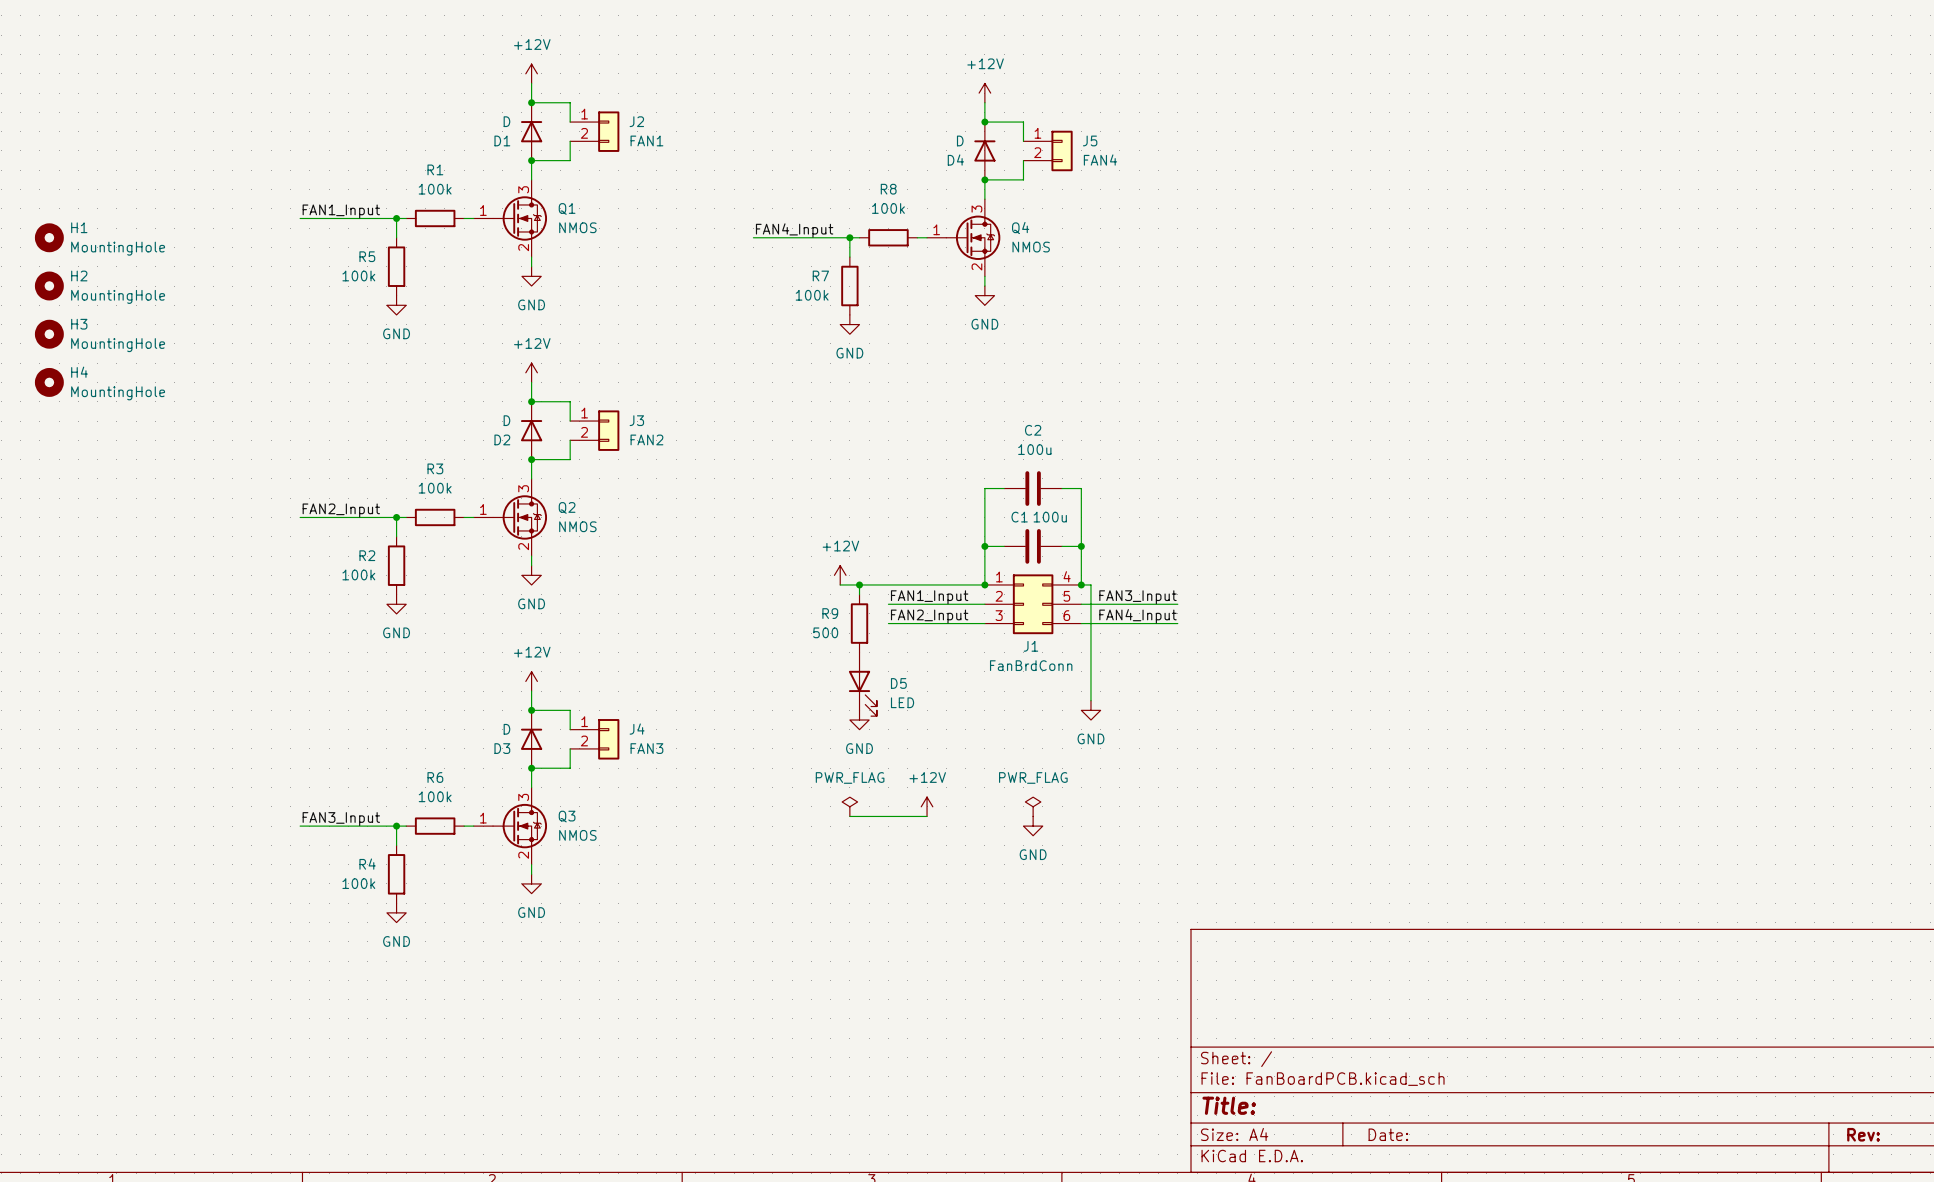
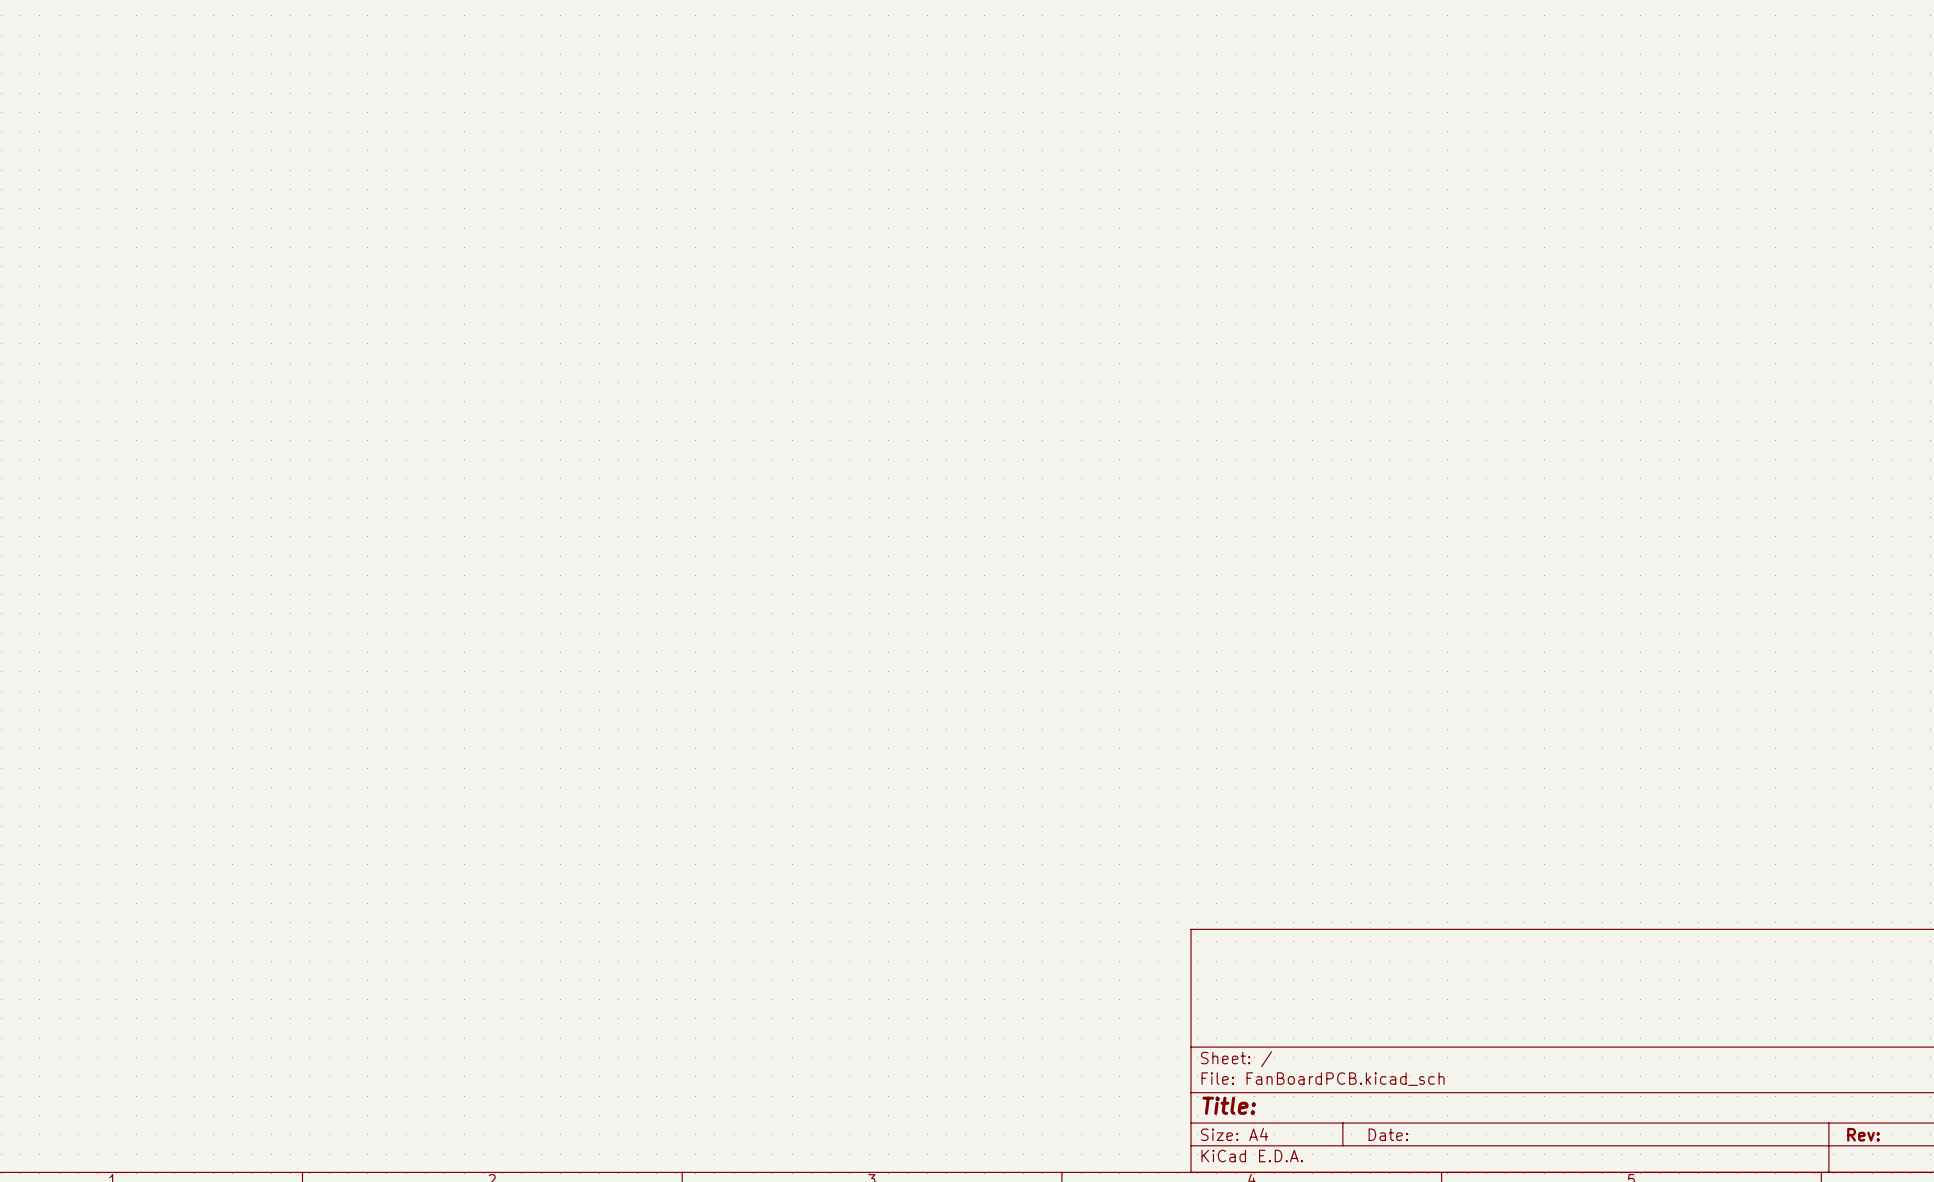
power symbol: +12V (531, 73) -> none
wire: (531, 83) (531, 102) (570, 102) (570, 122) -> none
power symbol: +12V (984, 93) -> none
junction: (531, 102) -> none
wire: (984, 102) (984, 122) (1023, 122) (1023, 141) -> none
junction: (984, 122) -> none
D1: D (531, 131) -> none
J2: FAN1 (594, 131) -> none
wire: (570, 141) (570, 160) (531, 160) (531, 179) -> none
D4: D (984, 150) -> none
J5: FAN4 (1048, 150) -> none
junction: (531, 160) -> none
wire: (1023, 160) (1023, 179) (984, 179) (984, 199) -> none
junction: (984, 179) -> none
label: FAN1_Input (341, 211) -> none
wire: (300, 218) (406, 218) -> none
wire: (396, 218) (396, 237) -> none
junction: (396, 218) -> none
R1: 100k (435, 218) -> none
wire: (464, 218) (473, 218) -> none
Q1: NMOS (510, 218) -> none
label: FAN4_Input (794, 230) -> none
H1: MountingHole (49, 237) -> none
wire: (753, 237) (859, 237) -> none
wire: (849, 237) (849, 257) -> none
junction: (849, 237) -> none
R8: 100k (888, 237) -> none
wire: (917, 237) (927, 237) -> none
Q4: NMOS (963, 237) -> none
wire: (531, 257) (531, 266) -> none
R5: 100k (396, 266) -> none
power symbol: GND (531, 276) -> none
wire: (984, 276) (984, 286) -> none
H2: MountingHole (49, 286) -> none
R7: 100k (849, 286) -> none
power symbol: GND (984, 295) -> none
power symbol: GND (396, 305) -> none
power symbol: GND (849, 324) -> none
H3: MountingHole (49, 334) -> none
power symbol: +12V (531, 372) -> none
H4: MountingHole (49, 382) -> none
wire: (531, 382) (531, 401) (570, 401) (570, 421) -> none
junction: (531, 401) -> none
D2: D (531, 430) -> none
J3: FAN2 (594, 430) -> none
wire: (570, 440) (570, 459) (531, 459) (531, 478) -> none
junction: (531, 459) -> none
wire: (1004, 488) (984, 488) (984, 584) (840, 584) -> none
C2: 100u (1033, 488) -> none
wire: (1062, 488) (1081, 488) (1081, 584) (1090, 584) (1090, 700) -> none
label: FAN2_Input (341, 510) -> none
wire: (300, 517) (406, 517) -> none
wire: (396, 517) (396, 536) -> none
junction: (396, 517) -> none
R3: 100k (435, 517) -> none
wire: (464, 517) (473, 517) -> none
Q2: NMOS (510, 517) -> none
wire: (984, 546) (1004, 546) -> none
junction: (984, 546) -> none
C1: 100u (1033, 546) -> none
wire: (1062, 546) (1081, 546) -> none
junction: (1081, 546) -> none
wire: (531, 556) (531, 565) -> none
R2: 100k (396, 565) -> none
power symbol: GND (531, 575) -> none
power symbol: +12V (840, 575) -> none
wire: (859, 584) (859, 594) -> none
junction: (859, 584) -> none
junction: (984, 584) -> none
junction: (1081, 584) -> none
label: FAN1_Input (929, 597) -> none
label: FAN3_Input (1137, 597) -> none
power symbol: GND (396, 604) -> none
wire: (888, 604) (984, 604) -> none
J1: FanBrdConn (1033, 604) -> none
wire: (1081, 604) (1177, 604) -> none
label: FAN2_Input (929, 616) -> none
label: FAN4_Input (1137, 616) -> none
R9: 500 (859, 623) -> none
wire: (888, 623) (984, 623) -> none
wire: (1081, 623) (1177, 623) -> none
power symbol: +12V (531, 681) -> none
D5: LED (862, 684) -> none
wire: (531, 691) (531, 710) (570, 710) (570, 729) -> none
junction: (531, 710) -> none
power symbol: GND (1090, 710) -> none
power symbol: GND (859, 720) -> none
D3: D (531, 739) -> none
J4: FAN3 (594, 739) -> none
wire: (570, 748) (570, 768) (531, 768) (531, 787) -> none
junction: (531, 768) -> none
power symbol: PWR_FLAG (849, 806) -> none
power symbol: +12V (927, 806) -> none
power symbol: PWR_FLAG (1033, 806) -> none
wire: (849, 816) (927, 816) -> none
label: FAN3_Input (341, 819) -> none
wire: (300, 826) (406, 826) -> none
wire: (396, 826) (396, 845) -> none
junction: (396, 826) -> none
R6: 100k (435, 826) -> none
wire: (464, 826) (473, 826) -> none
Q3: NMOS (510, 826) -> none
power symbol: GND (1033, 826) -> none
wire: (531, 864) (531, 874) -> none
R4: 100k (396, 874) -> none
power symbol: GND (531, 883) -> none
power symbol: GND (396, 912) -> none

